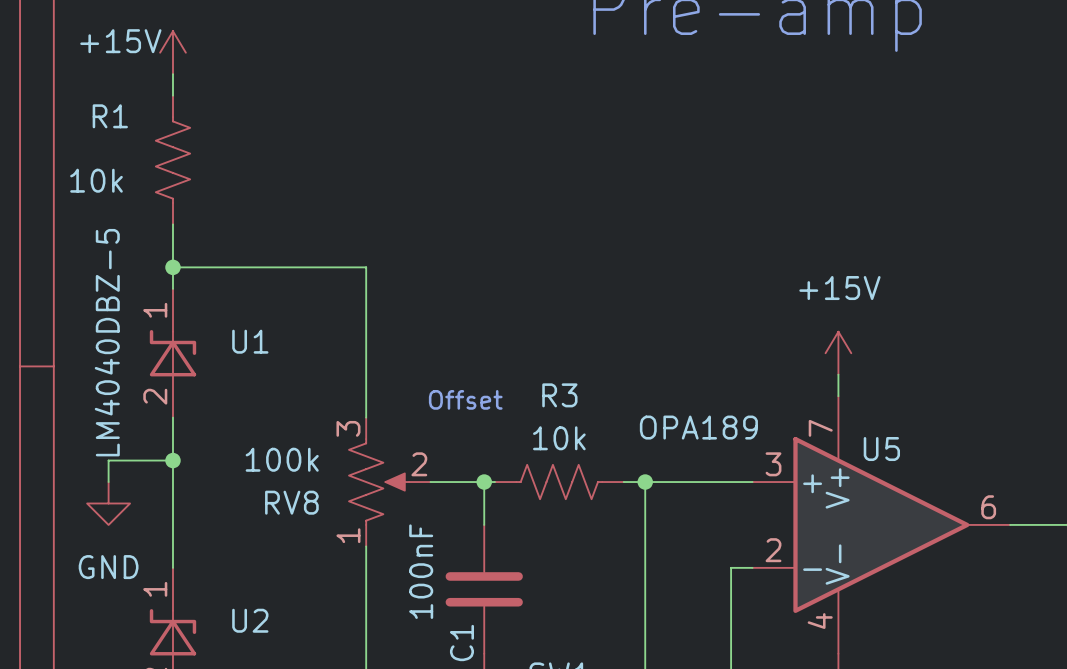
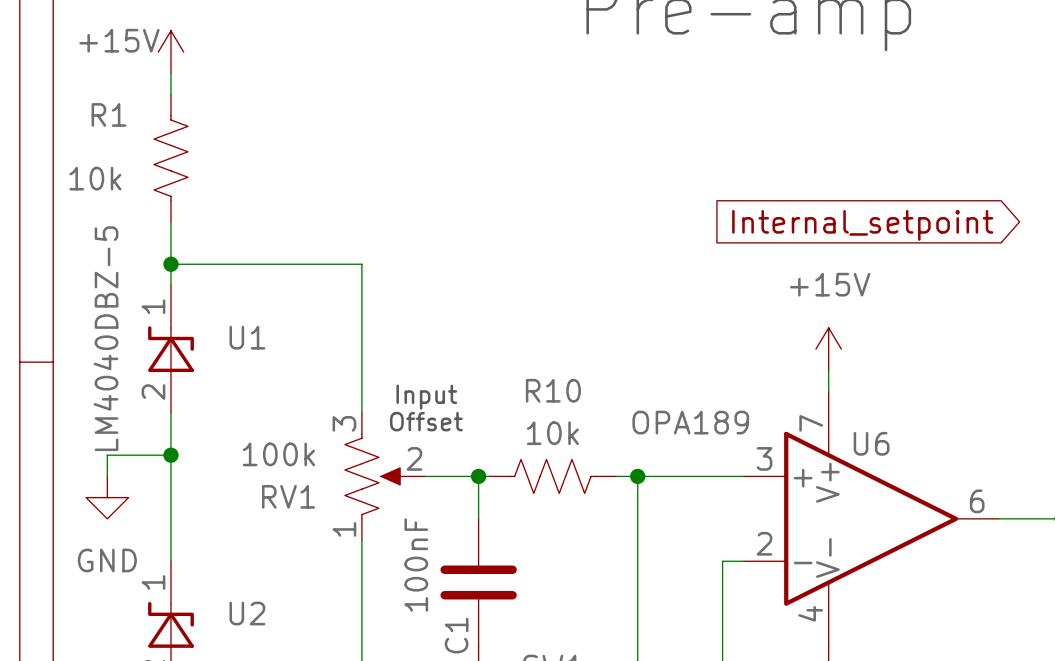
global label: none -> Internal_setpoint (862, 225)
R3 name: R3 (559, 395) -> R10 (553, 390)
text position: Offset (465, 399) -> Offset (426, 421)
text: none -> Input (426, 397)
U5 name: U5 (881, 449) -> U6 (871, 443)
RV8 name: RV8 (291, 502) -> RV1 (288, 496)

